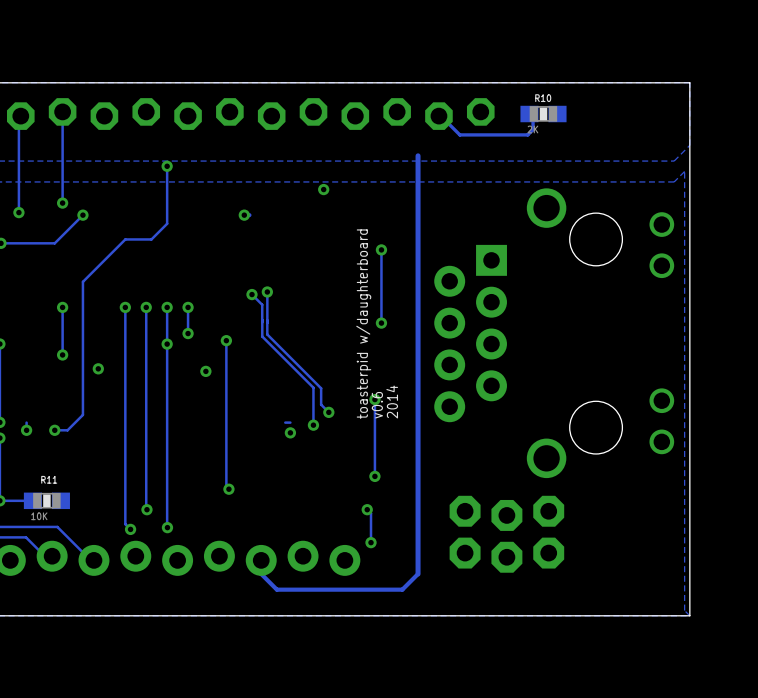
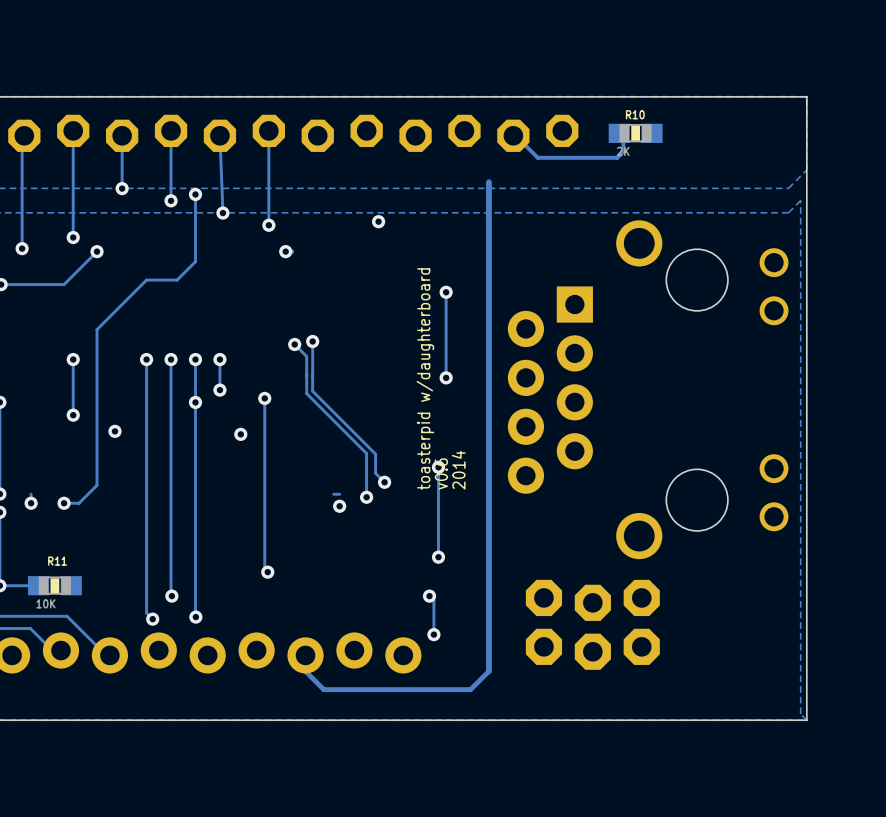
track: none -> (171, 130) (171, 200)
track: none -> (268, 130) (268, 225)
track: none -> (122, 135) (122, 188)
track: none -> (219, 135) (222, 213)
via: none -> (122, 188)
via: none -> (171, 200)
via: none -> (222, 213)
via: none -> (268, 225)

